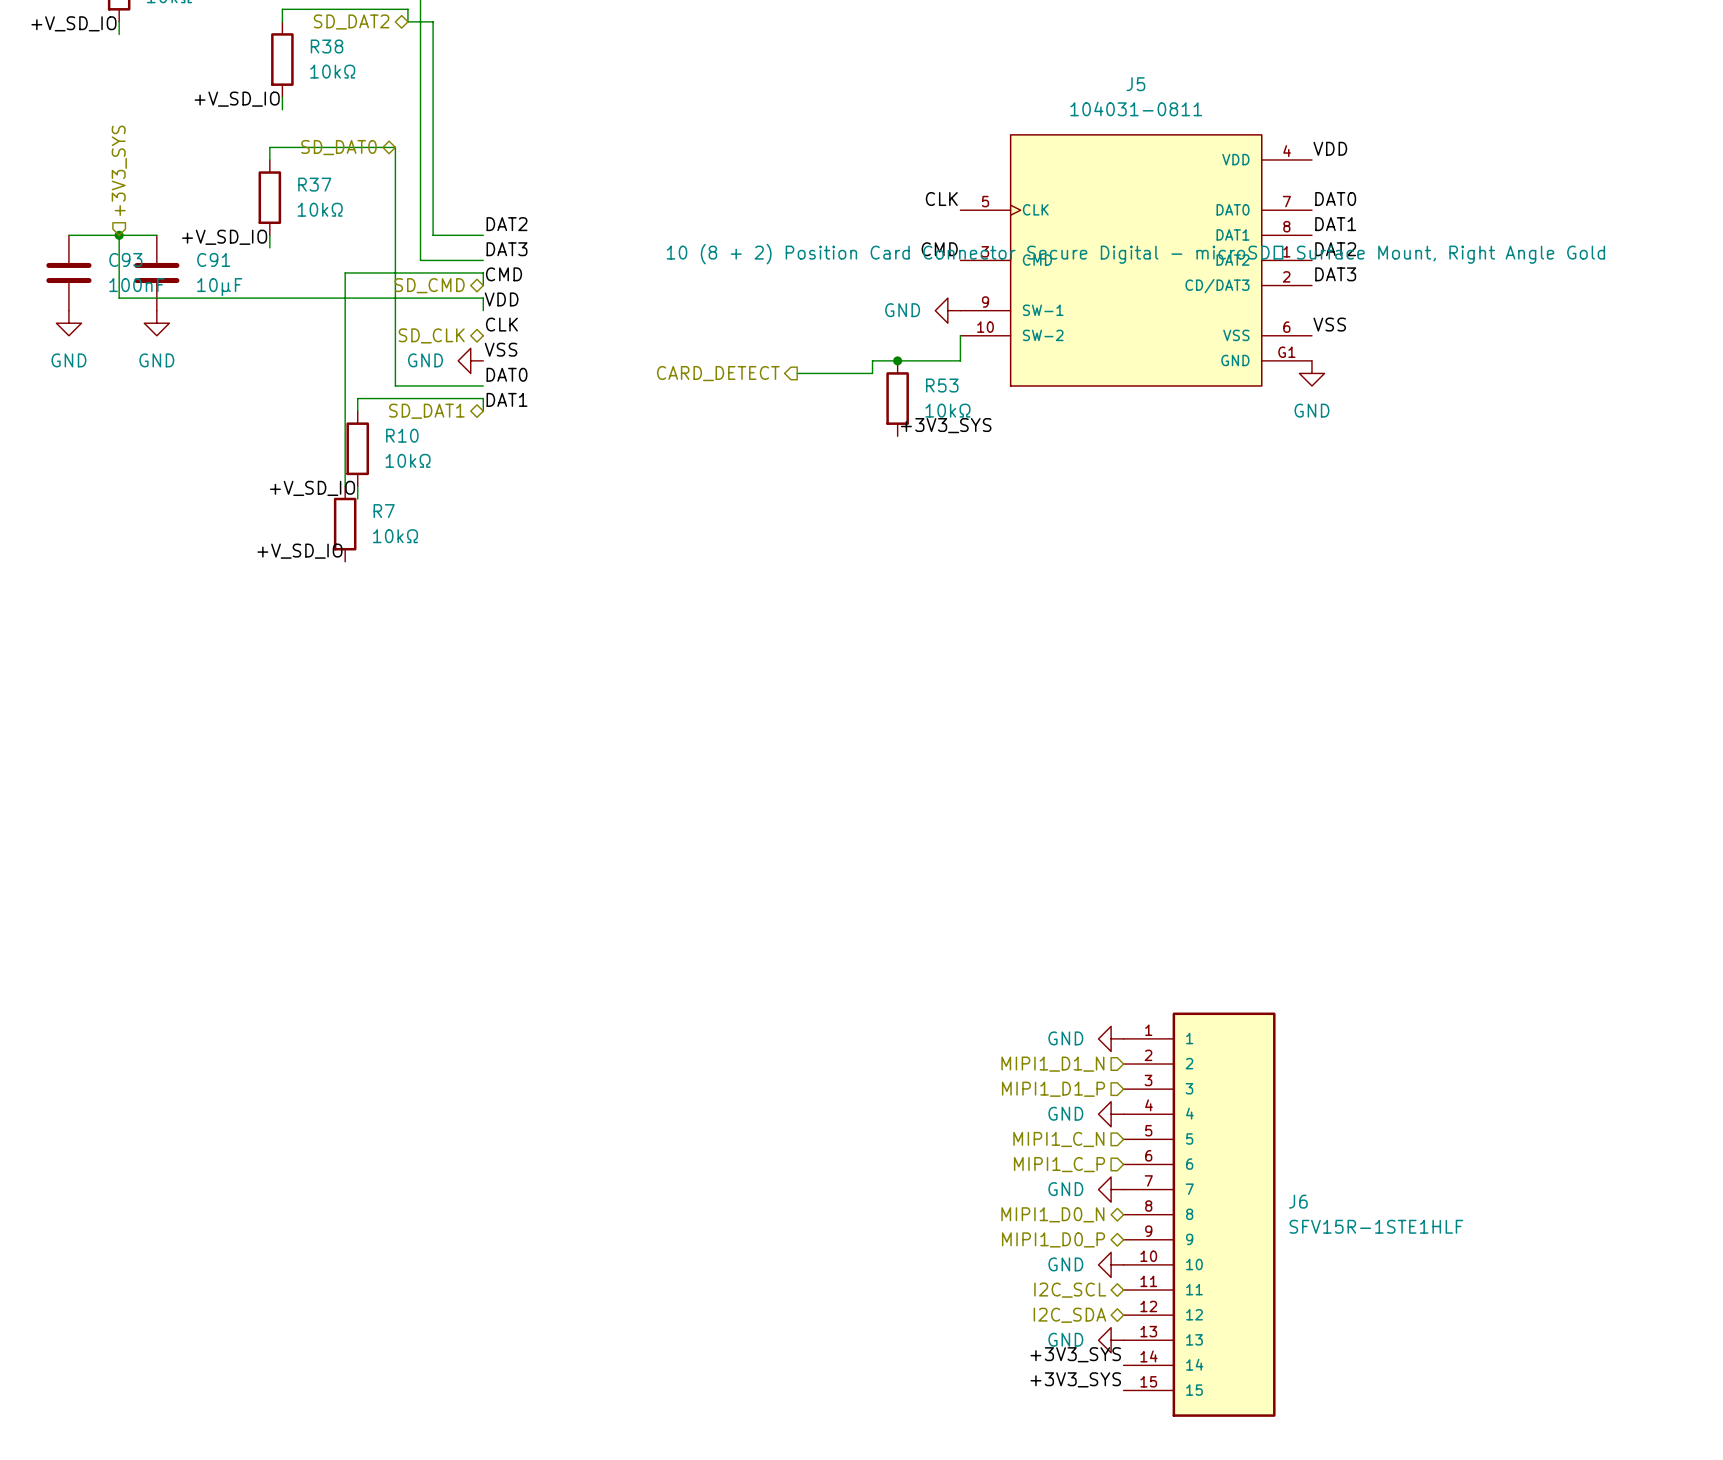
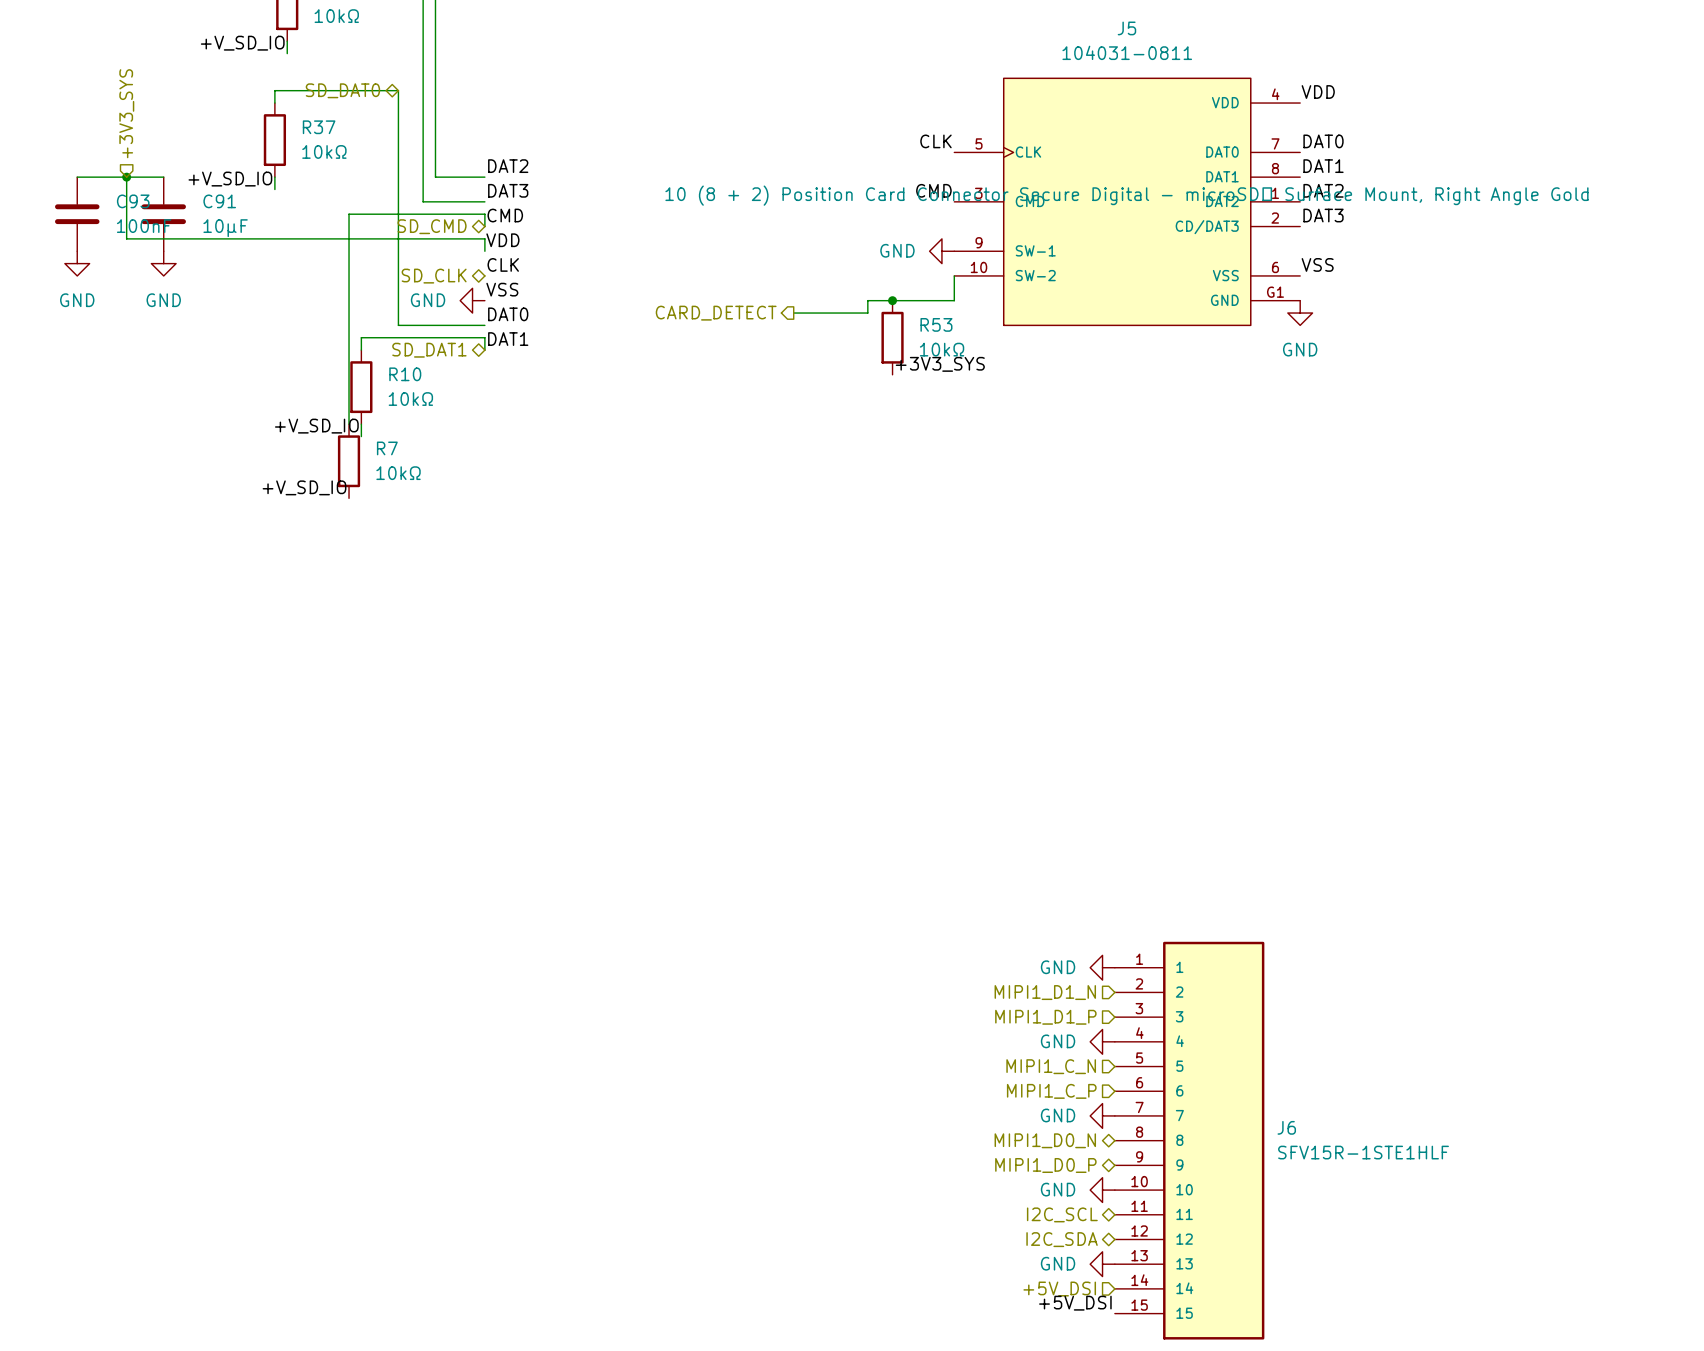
label: +3V3_SYS (1075, 1354) -> none
hierarchical label: none -> +5V_DSI (1059, 1289)
label: +3V3_SYS (1075, 1379) -> +5V_DSI (1075, 1303)

